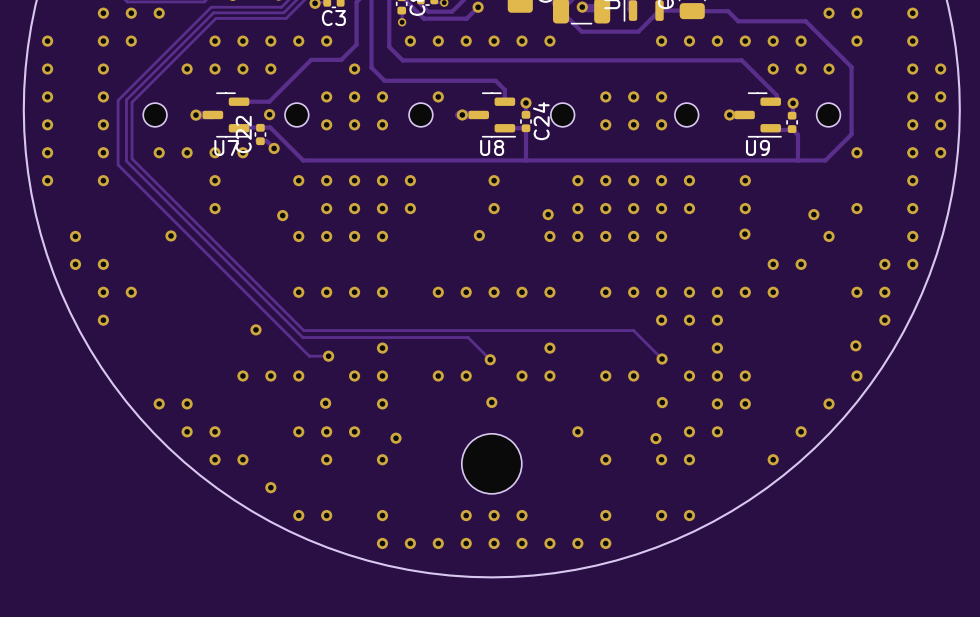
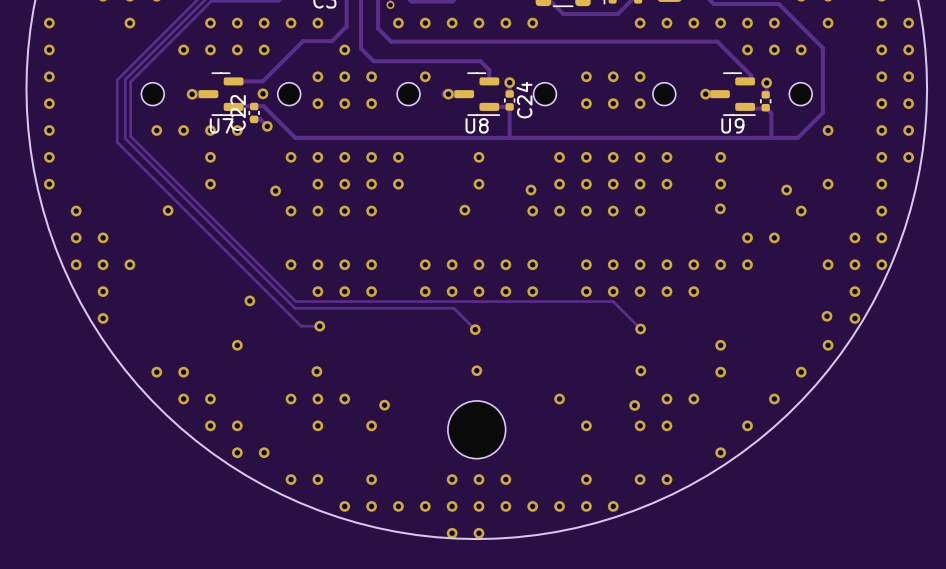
via: (103, 41) -> none
via: none -> (908, 23)
via: (103, 69) -> none
via: (103, 96) -> none
via: (103, 124) -> none
via: (103, 152) -> none
via: (103, 180) -> none
via: none -> (908, 157)
via: none -> (49, 184)
via: none -> (76, 264)
via: none -> (881, 264)
via: none -> (317, 291)
via: none -> (344, 291)
via: none -> (371, 291)
via: none -> (425, 291)
via: none -> (452, 291)
via: none -> (479, 291)
via: none -> (505, 291)
via: none -> (532, 291)
via: none -> (586, 291)
via: none -> (613, 291)
via: none -> (103, 318)
via: (382, 348) -> none
via: (549, 348) -> none
via: (717, 348) -> none
via: none -> (854, 318)
via: (270, 376) -> none
via: (298, 376) -> none
via: (354, 376) -> none
via: (382, 376) -> none
via: (438, 376) -> none
via: (466, 376) -> none
via: (522, 376) -> none
via: (549, 376) -> none
via: (605, 376) -> none
via: (633, 376) -> none
via: (689, 376) -> none
via: (717, 376) -> none
via: (382, 403) -> none
via: (717, 403) -> none
via: none -> (237, 452)
via: none -> (720, 452)
via: none -> (344, 506)
via: none -> (613, 506)
via: none -> (452, 533)
via: none -> (479, 533)

